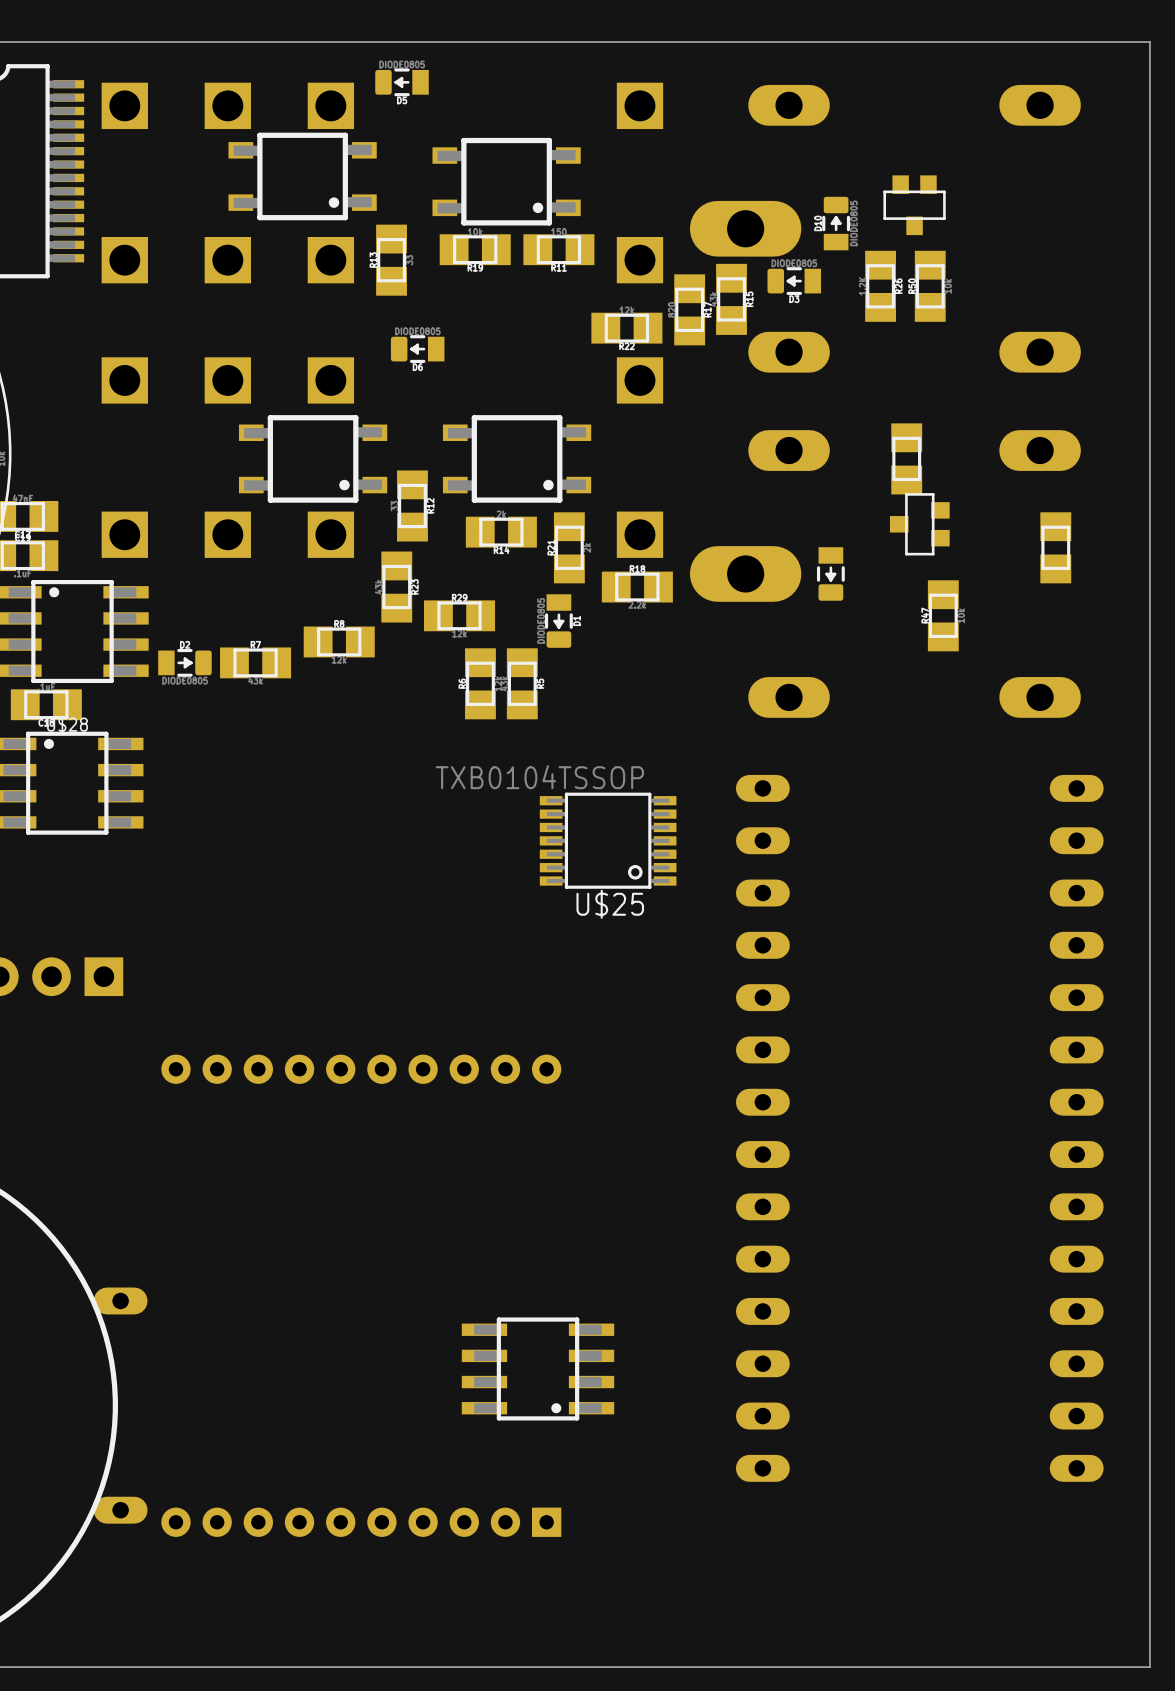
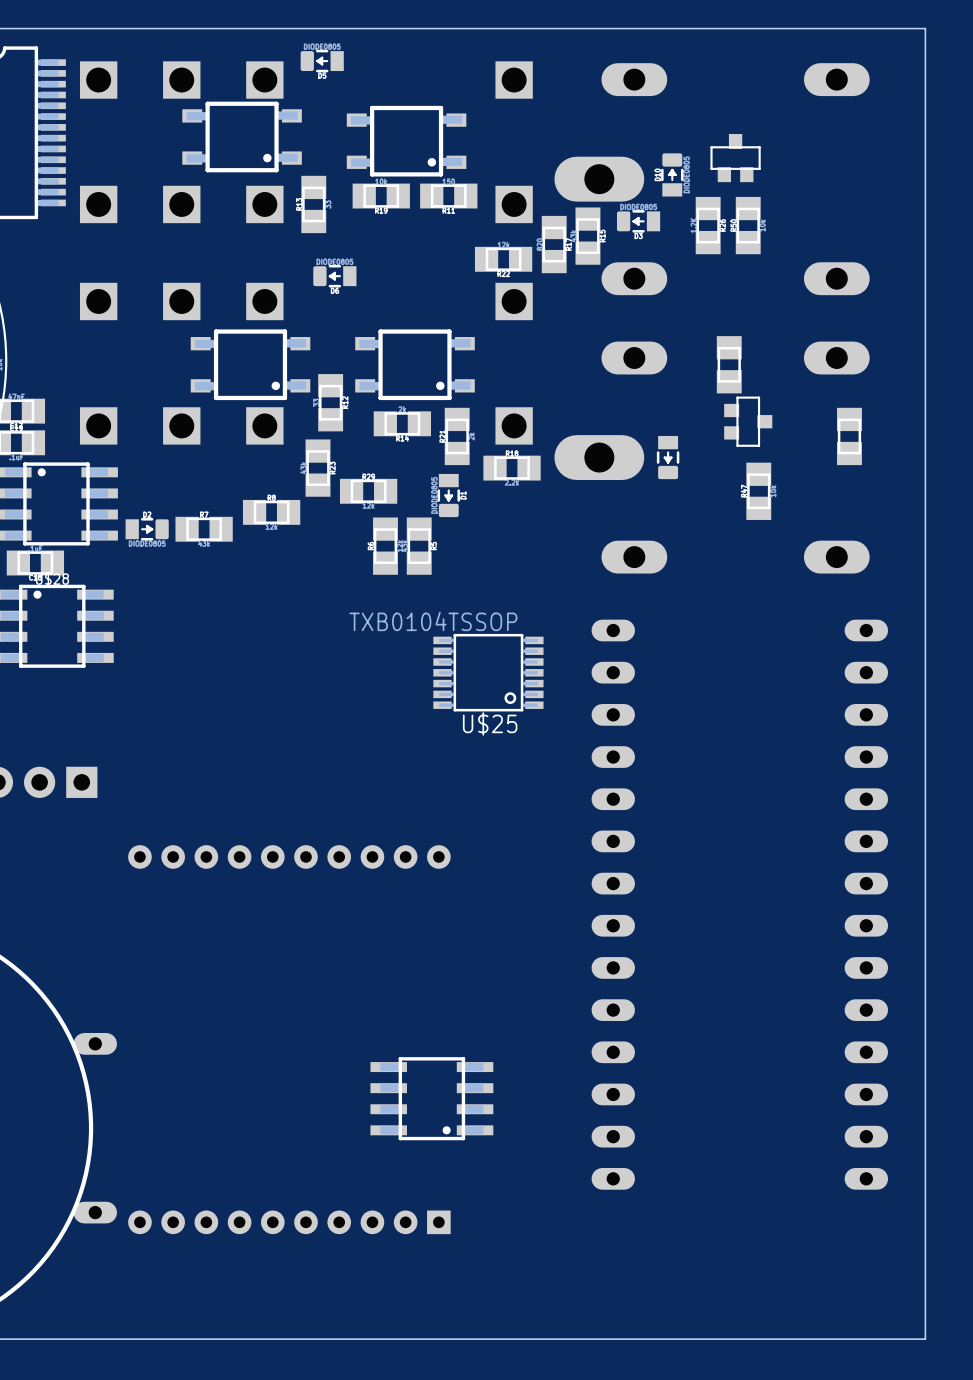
part rotation: 0° (914, 205) -> 180° (735, 158)
part rotation: 0° (919, 524) -> 180° (748, 421)

